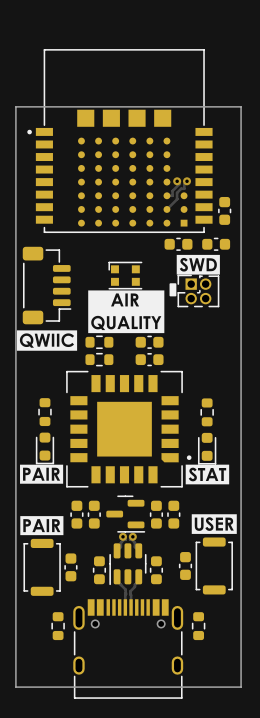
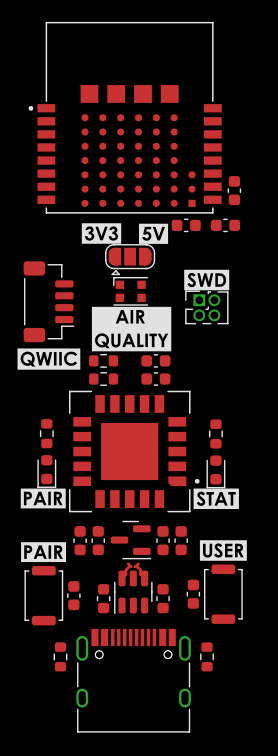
board edge: (15, 106) (241, 106) (241, 687) (15, 687) (15, 106) -> none
part position: (119, 141) -> (125, 117)
part: none -> (234, 190)
track: (177, 181) (179, 183) (172, 191) (172, 195) (166, 195) -> none
via: (177, 181) -> none
track: (187, 181) (184, 183) (184, 188) (181, 188) (177, 192) (177, 199) (166, 209) -> none
via: (187, 181) -> none
drawing: none -> [81, 223, 122, 244]
drawing: none -> [138, 223, 169, 244]
part rotation: 0° (224, 210) -> 90° clockwise (225, 225)
part: none -> (186, 225)
part: (178, 244) -> none
part: (216, 244) -> none
part: none -> (130, 259)
drawing: [169, 283, 177, 297] -> none
via: (122, 536) -> none
via: (132, 536) -> none
track: (138, 576) (138, 580) (130, 591) (131, 607) -> none
track: (120, 584) (125, 589) (125, 607) -> none

